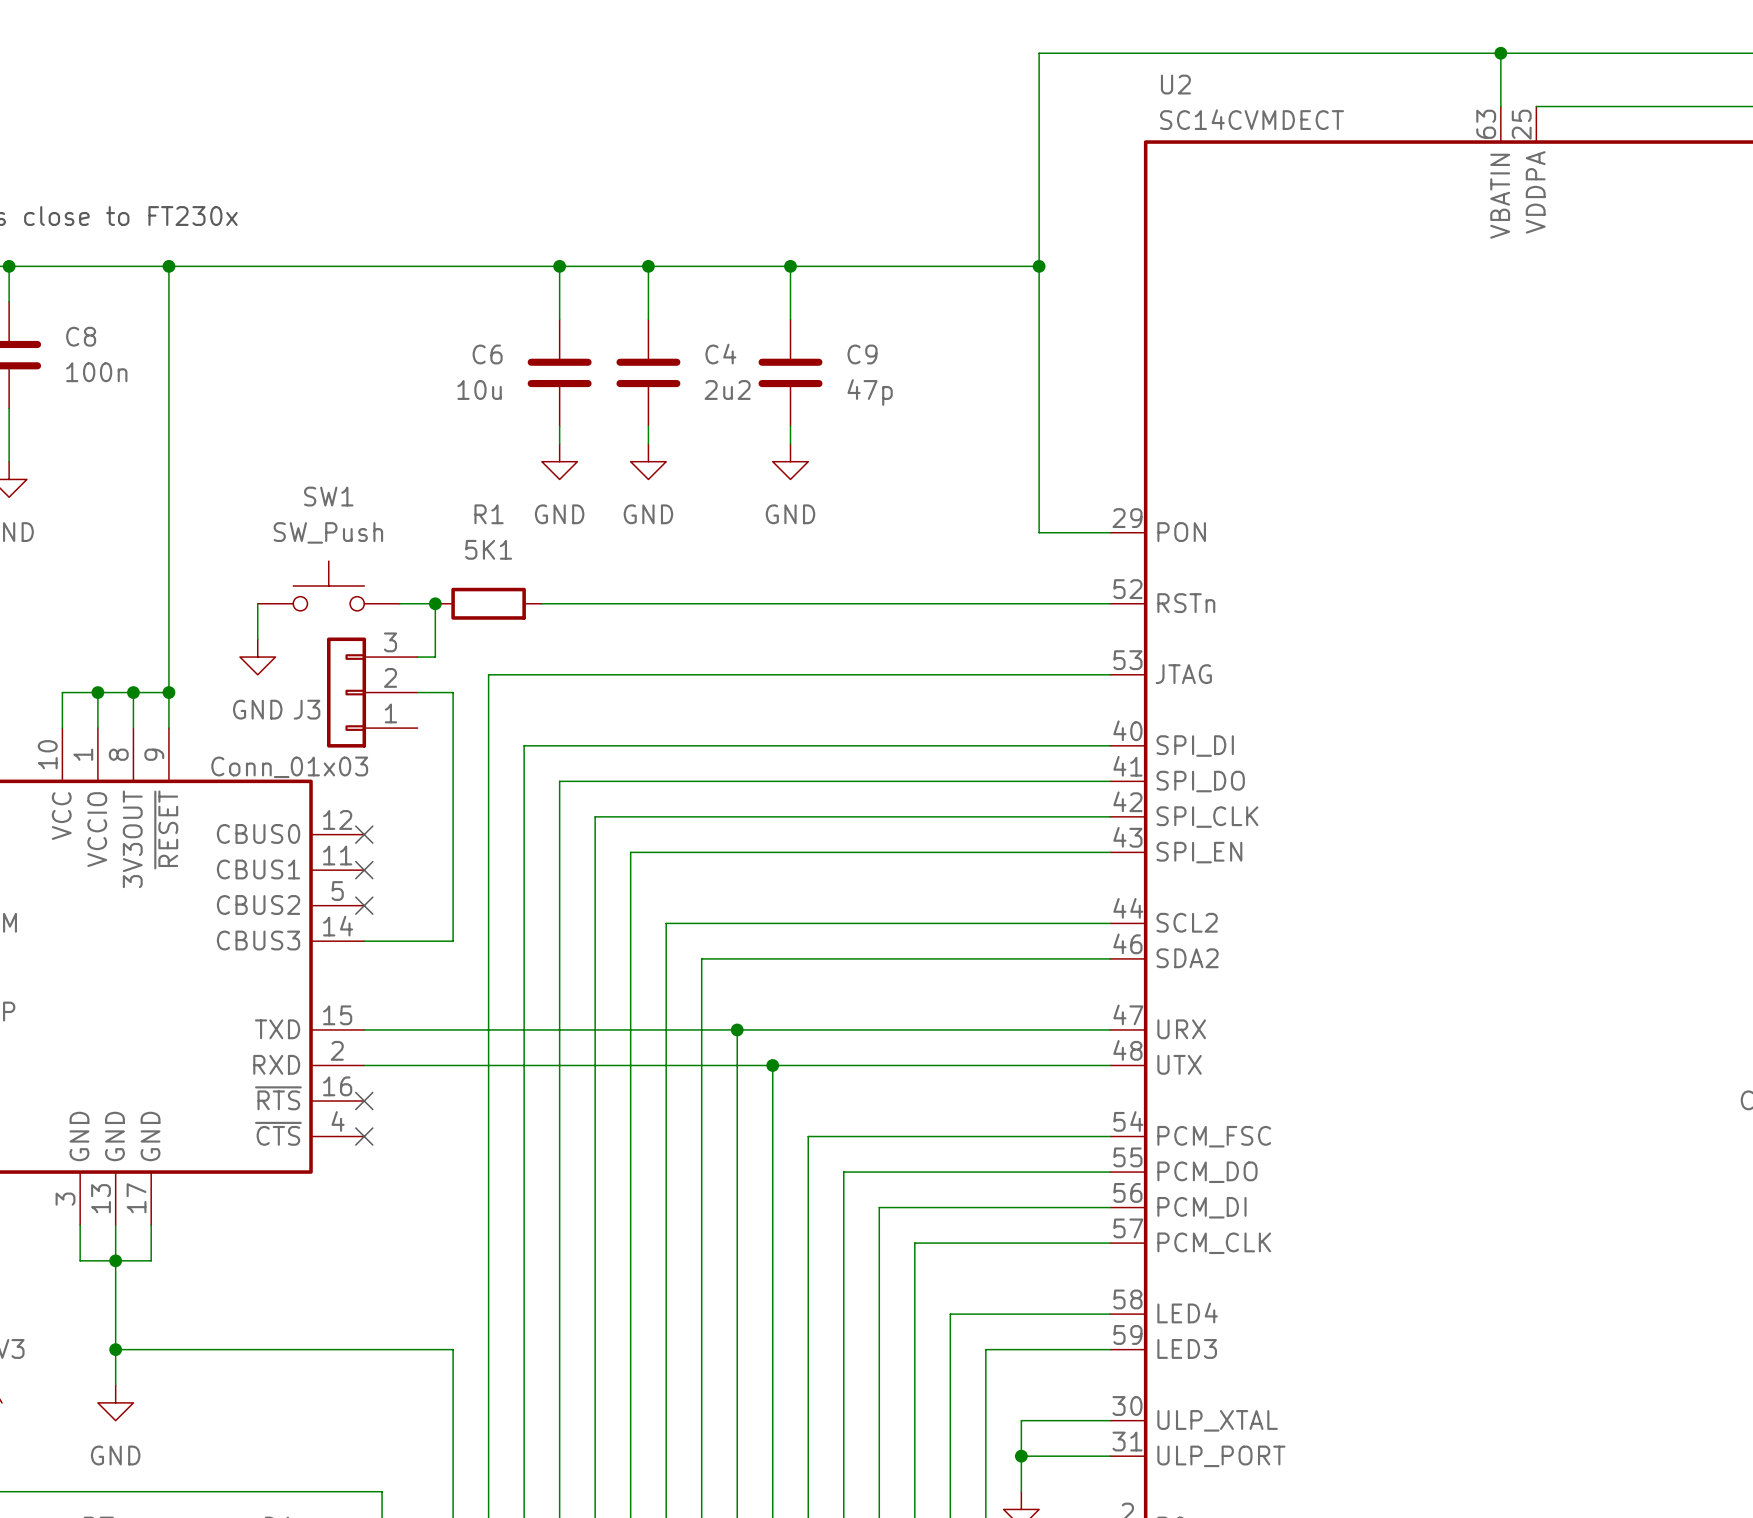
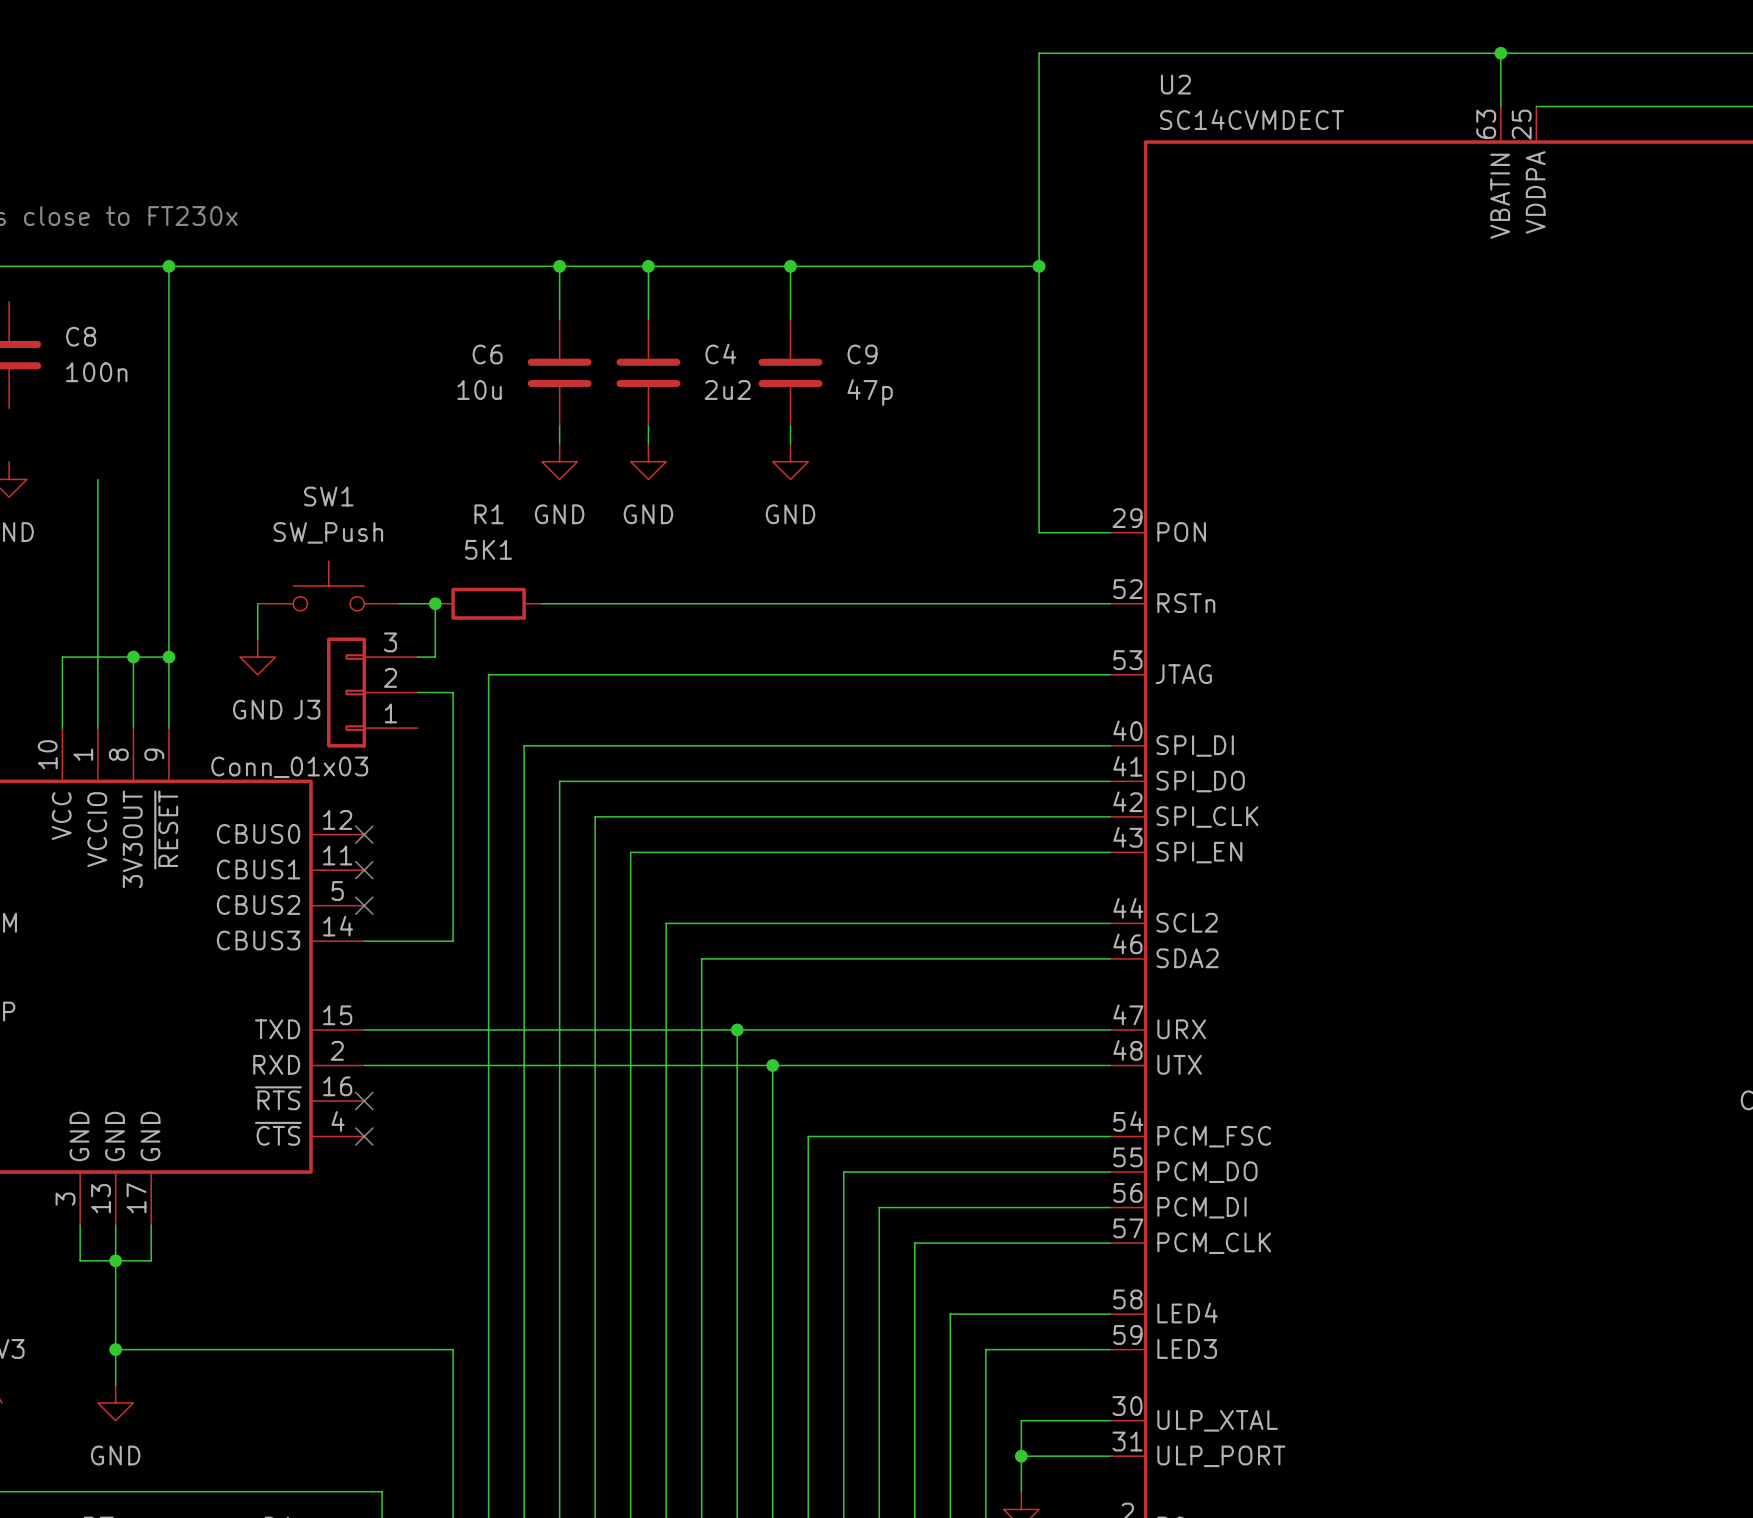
wire: (9, 266) (9, 301) -> none
junction: (9, 266) -> none
wire: (9, 408) (9, 461) -> none
wire: none -> (97, 479) (97, 692)
wire: none -> (133, 657) (133, 692)
junction: none -> (133, 657)
junction: none -> (168, 657)
wire: (62, 692) (168, 692) -> (62, 692) (62, 657) (168, 657)
junction: (97, 692) -> none
junction: (133, 692) -> none
junction: (168, 692) -> none

